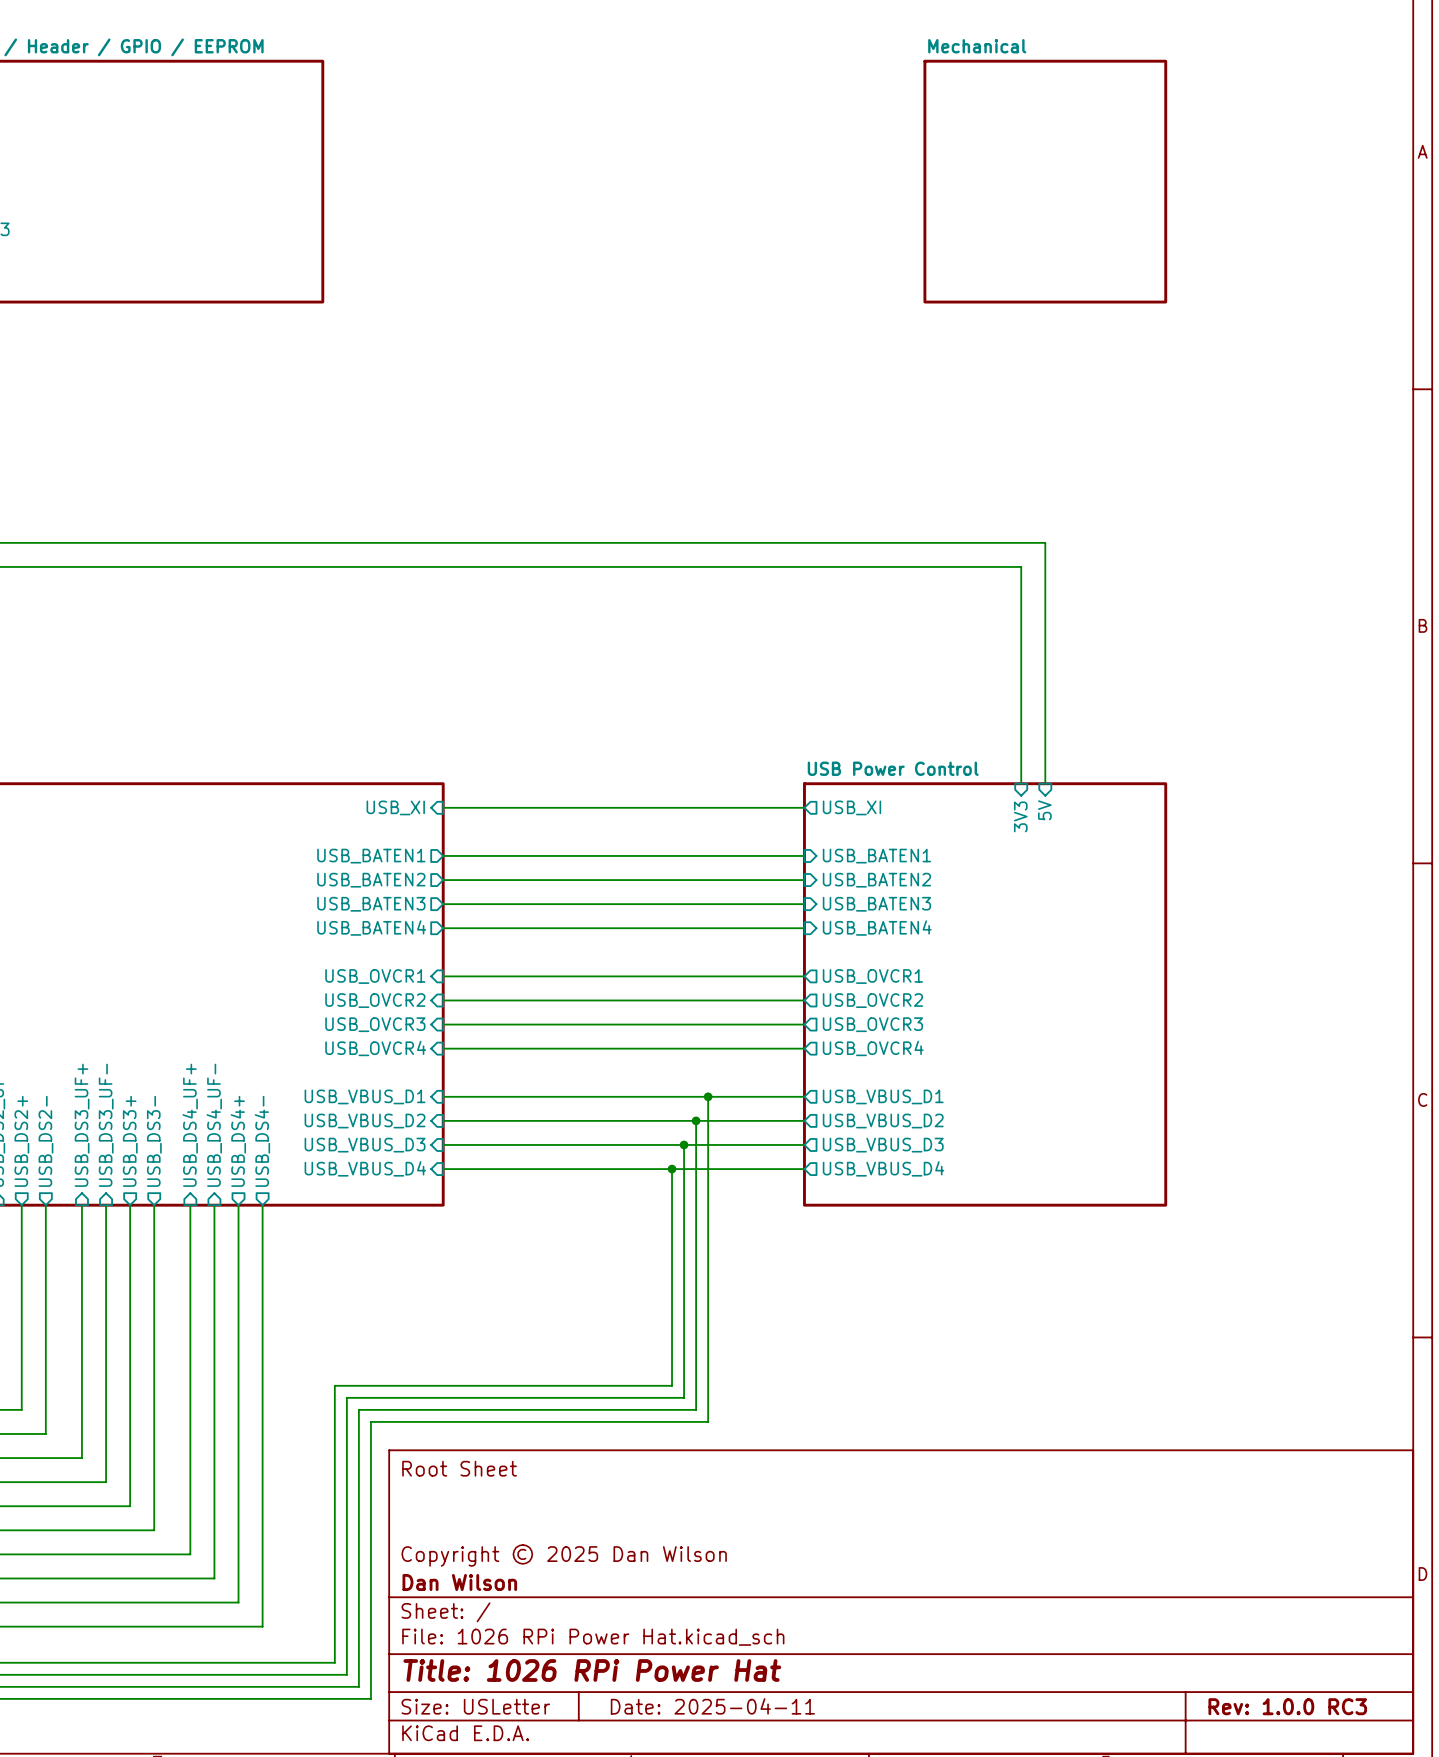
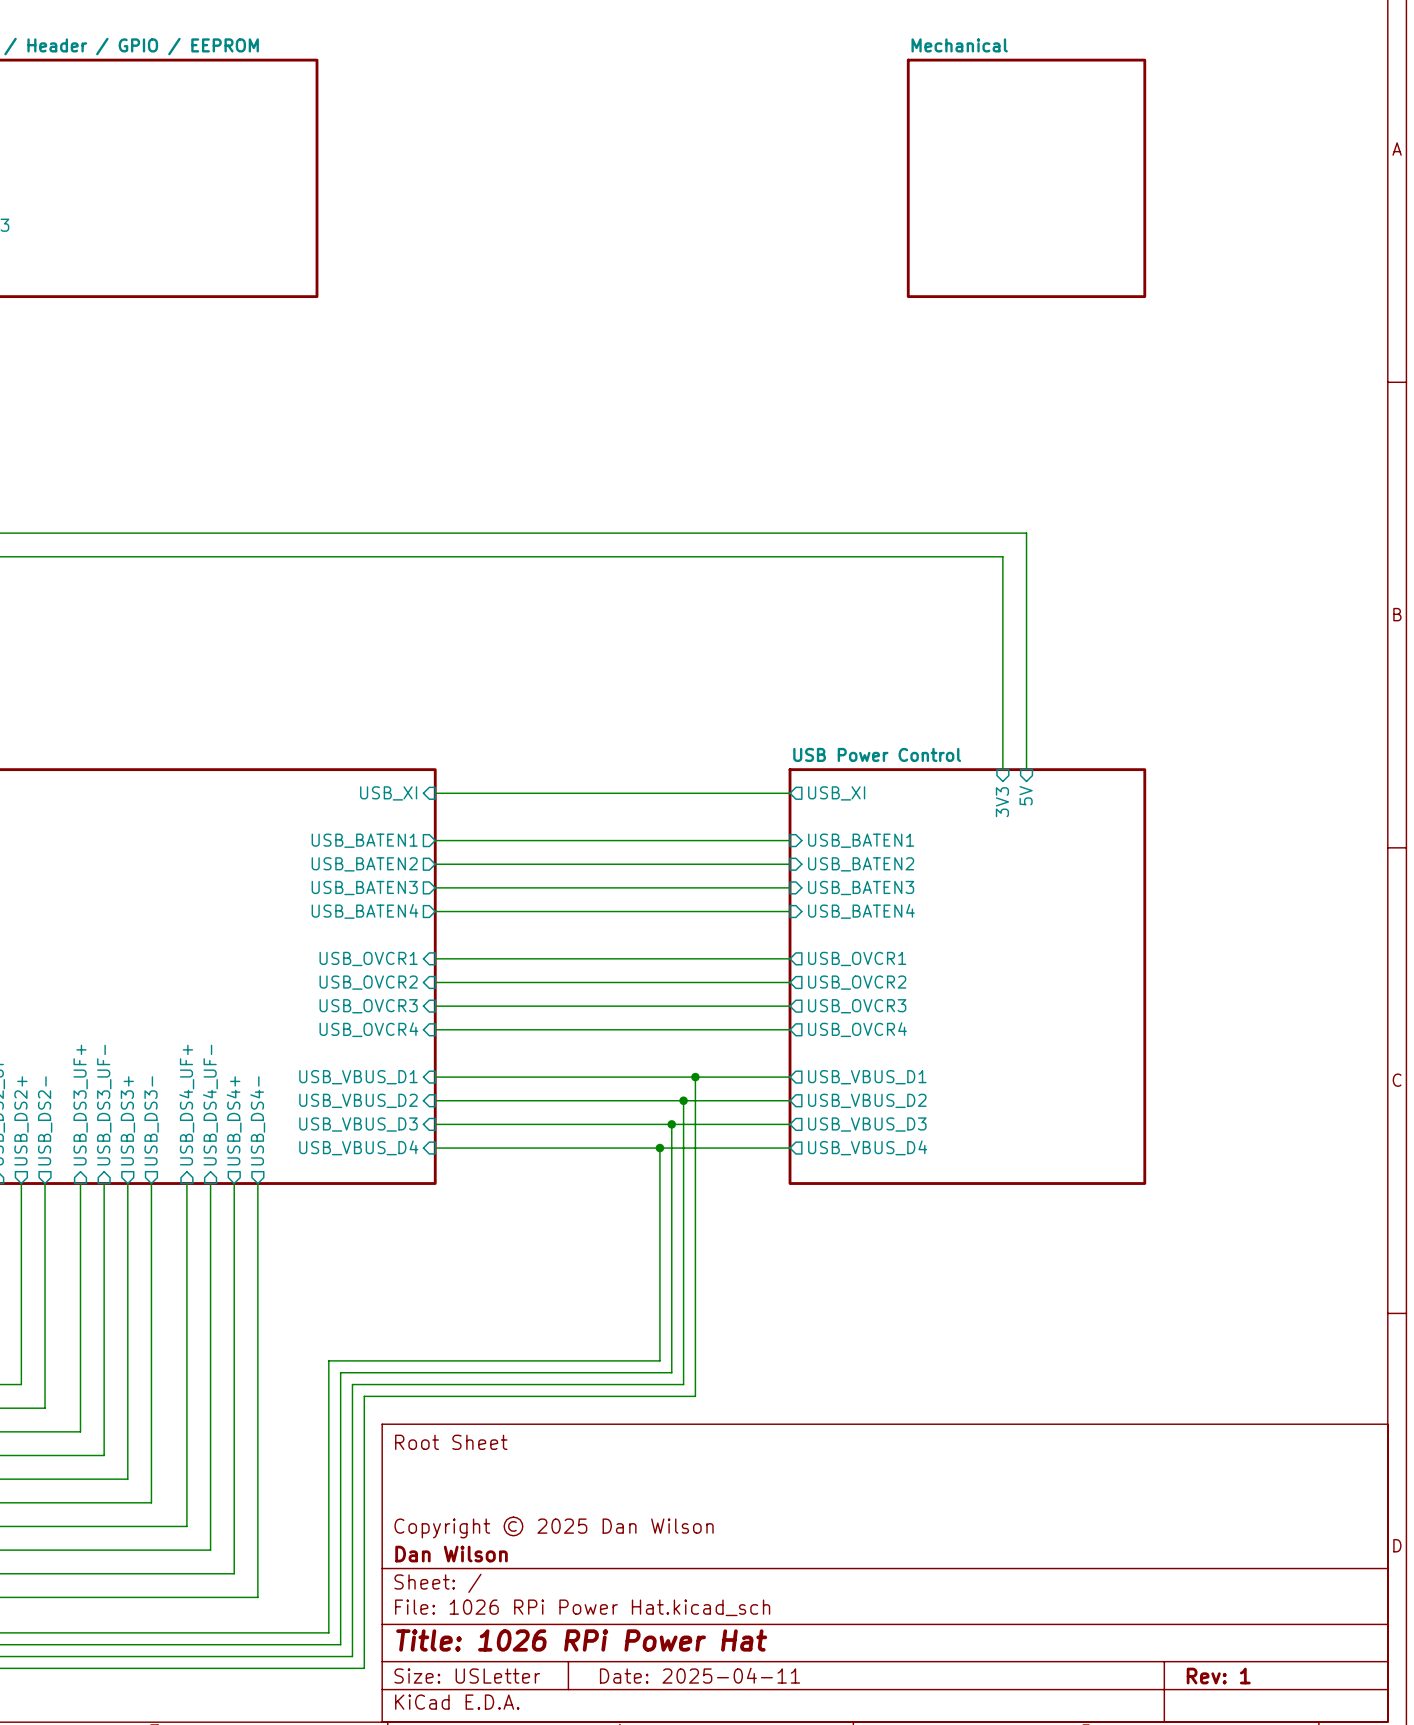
title block: Rev: 1.0.0 RC3 (1287, 1706) -> Rev: 1 (1218, 1676)

